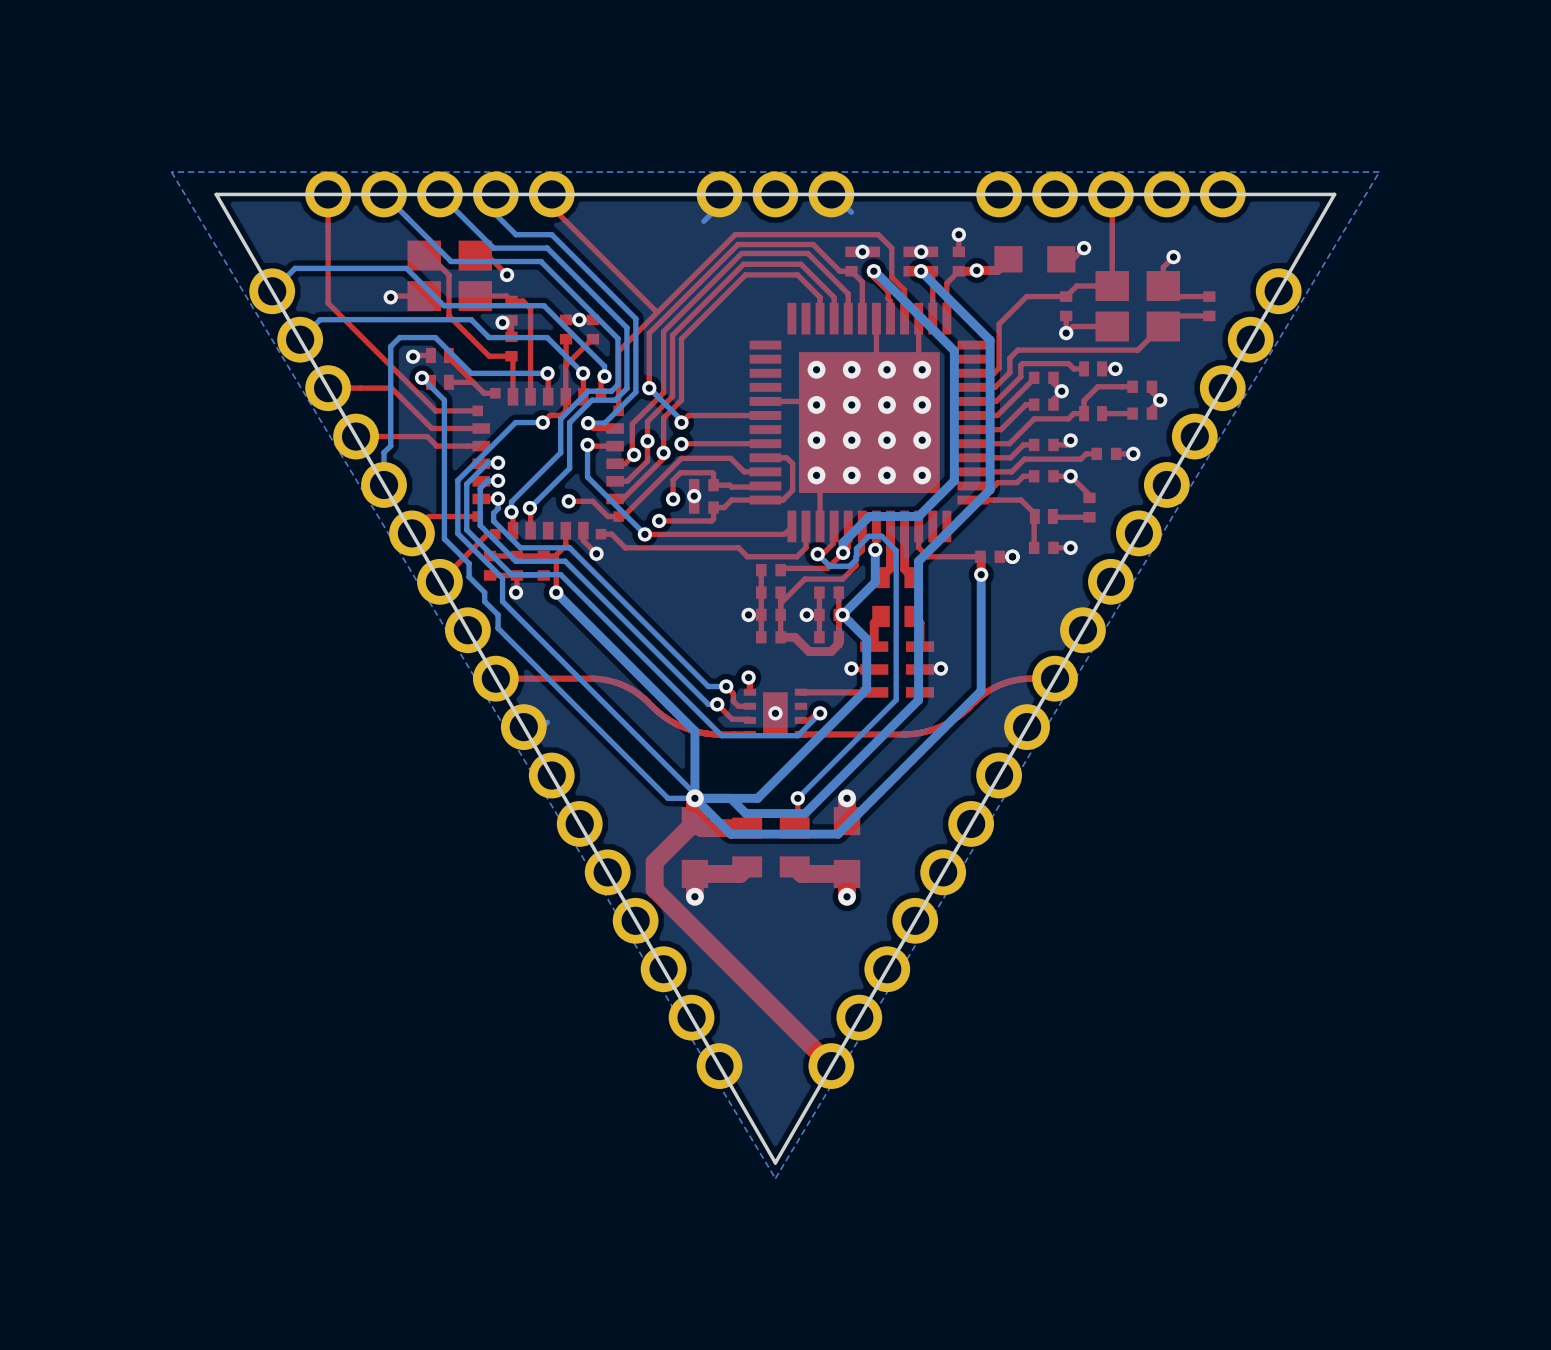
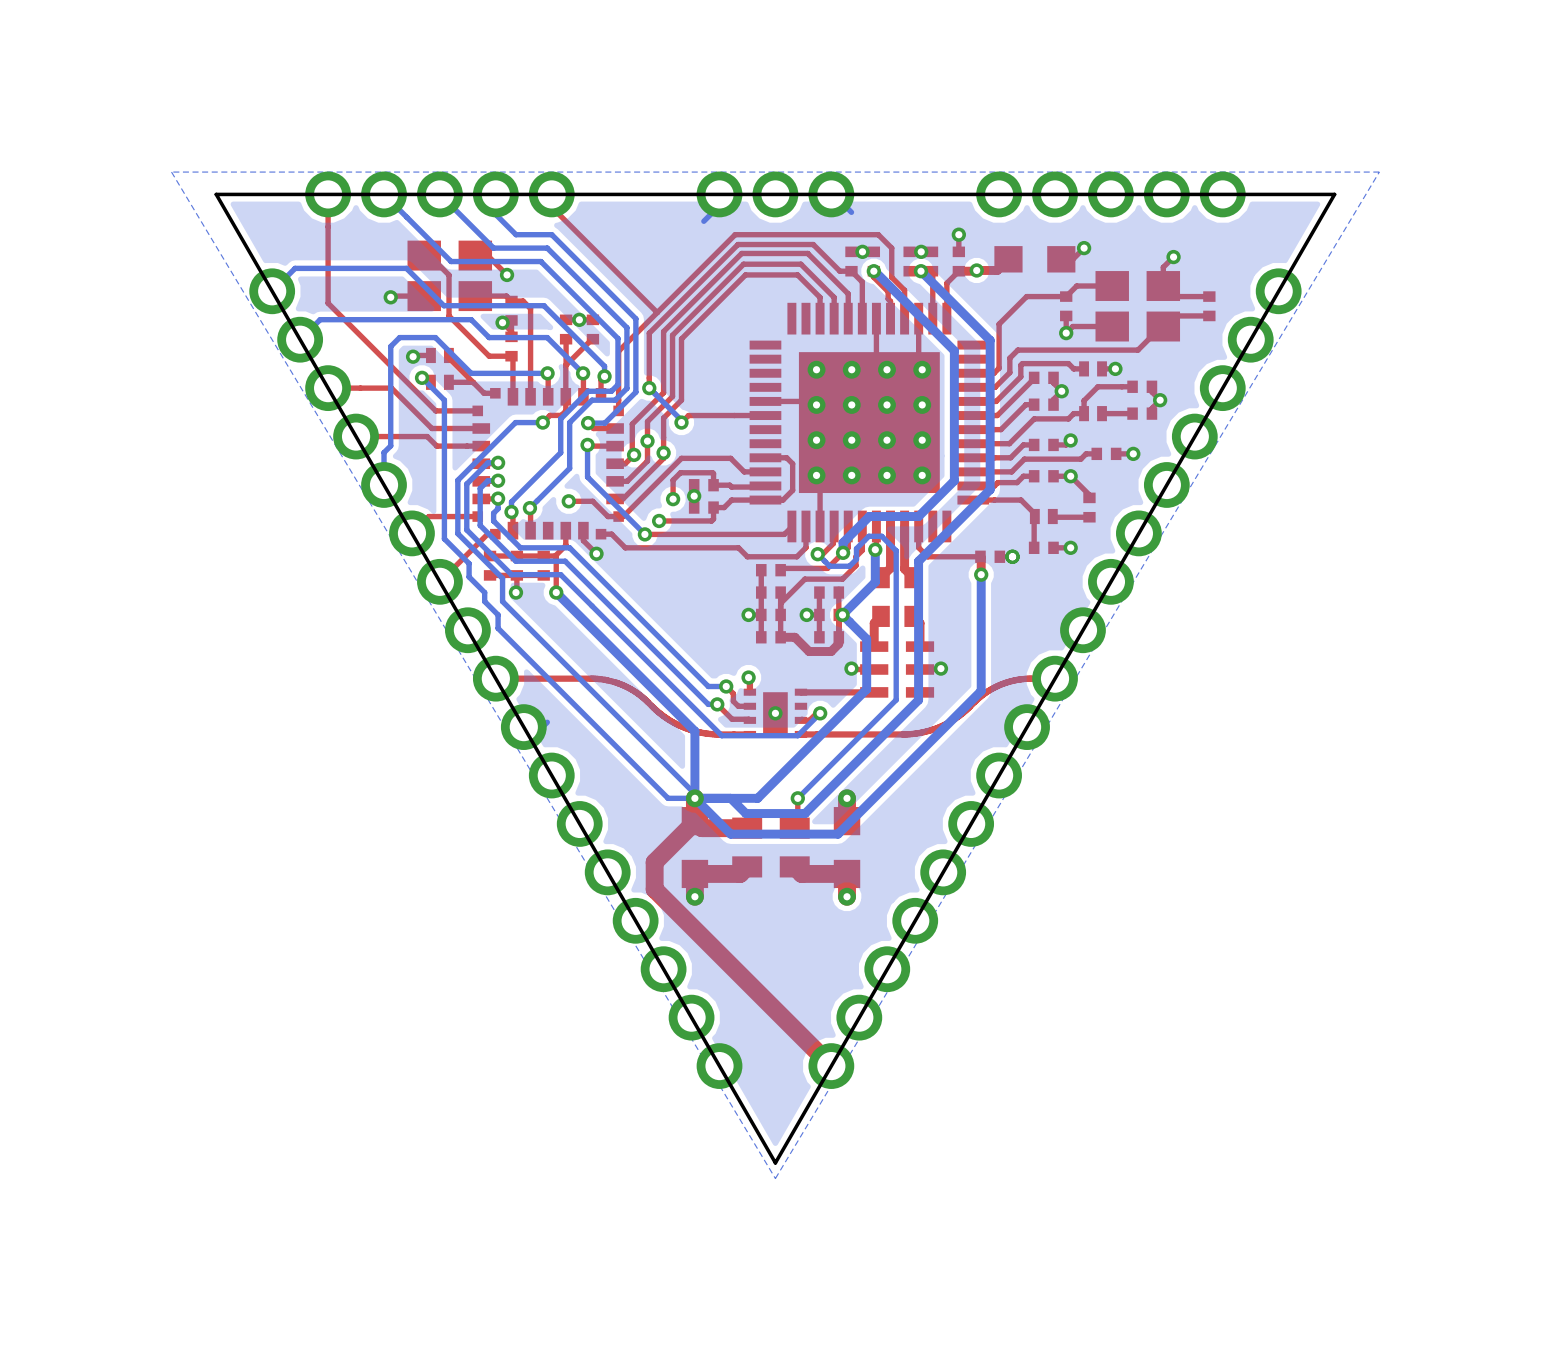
top track: (1110, 194) (1112, 286) -> none
top track: (765, 443) (681, 443) -> none
via: (681, 444) -> none

